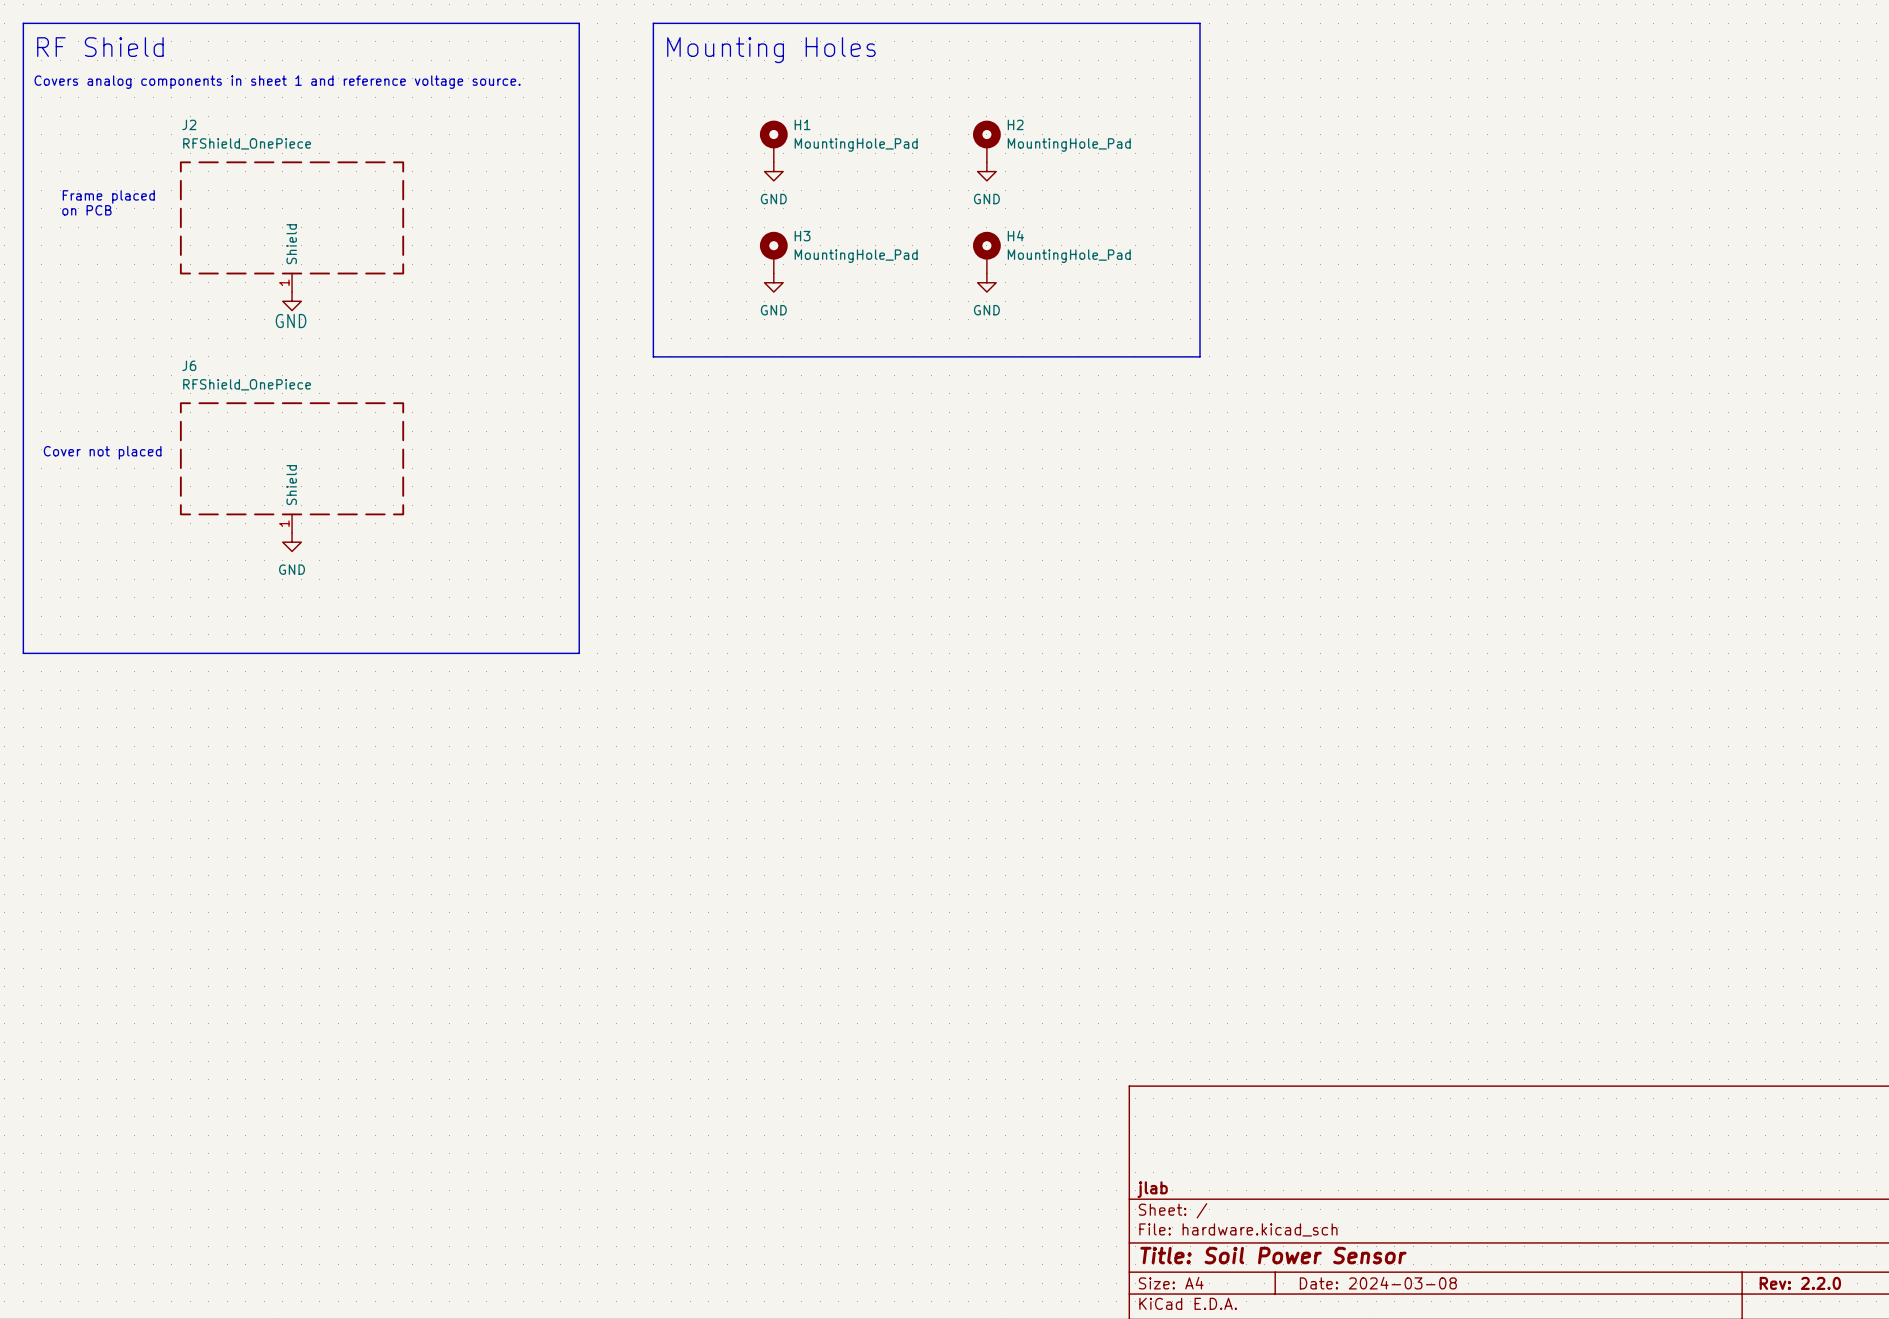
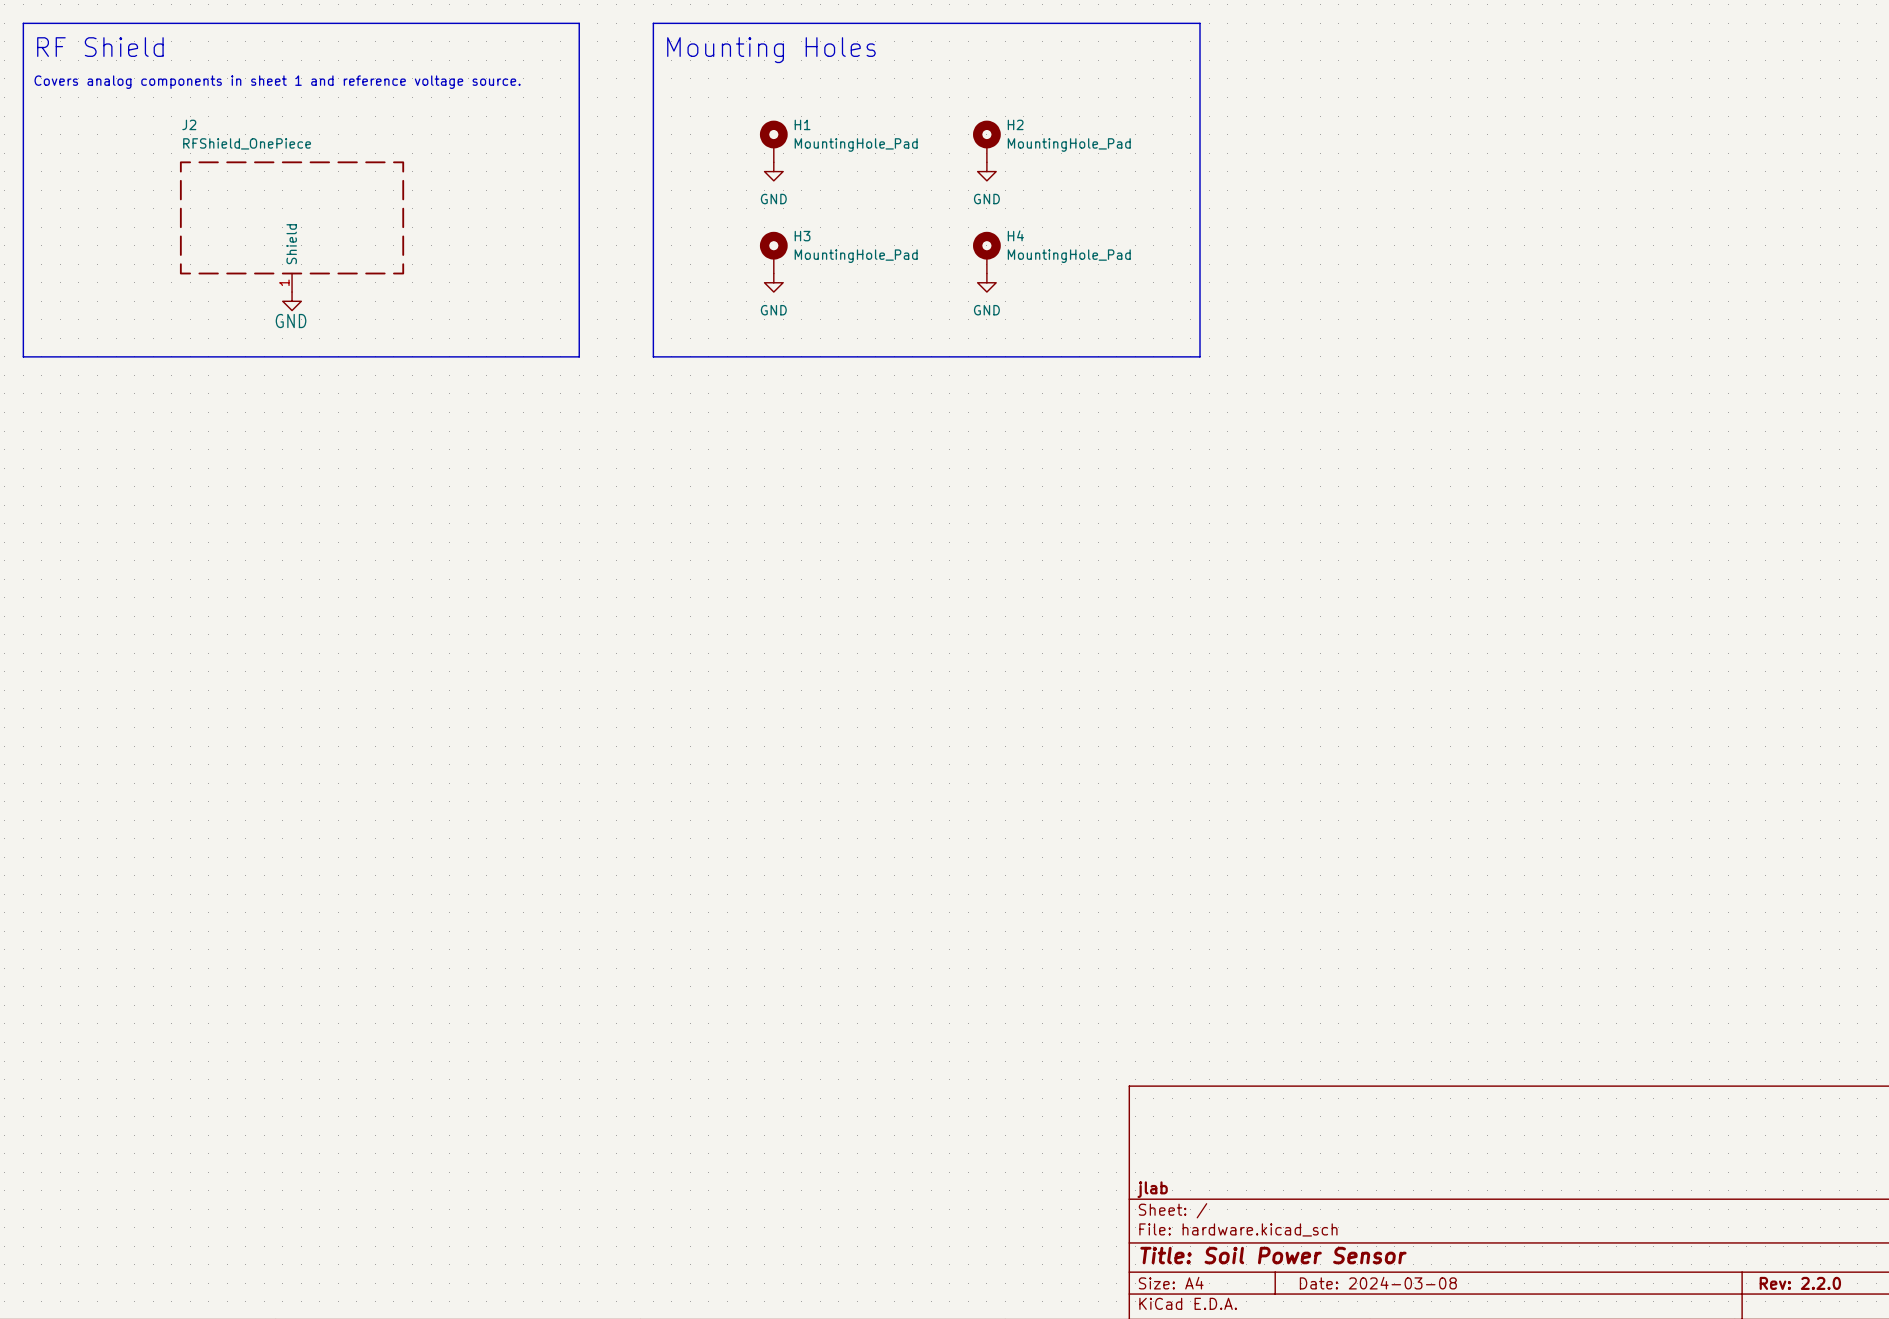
text: Frame placed (108, 196) -> none
text: on PCB (86, 210) -> none
line: (23, 356) (23, 653) (579, 653) (579, 356) -> (23, 356) (579, 356)
text: Cover not placed (102, 452) -> none
J6: RFShield_OnePiece (292, 467) -> none
power symbol: GND (292, 542) -> none

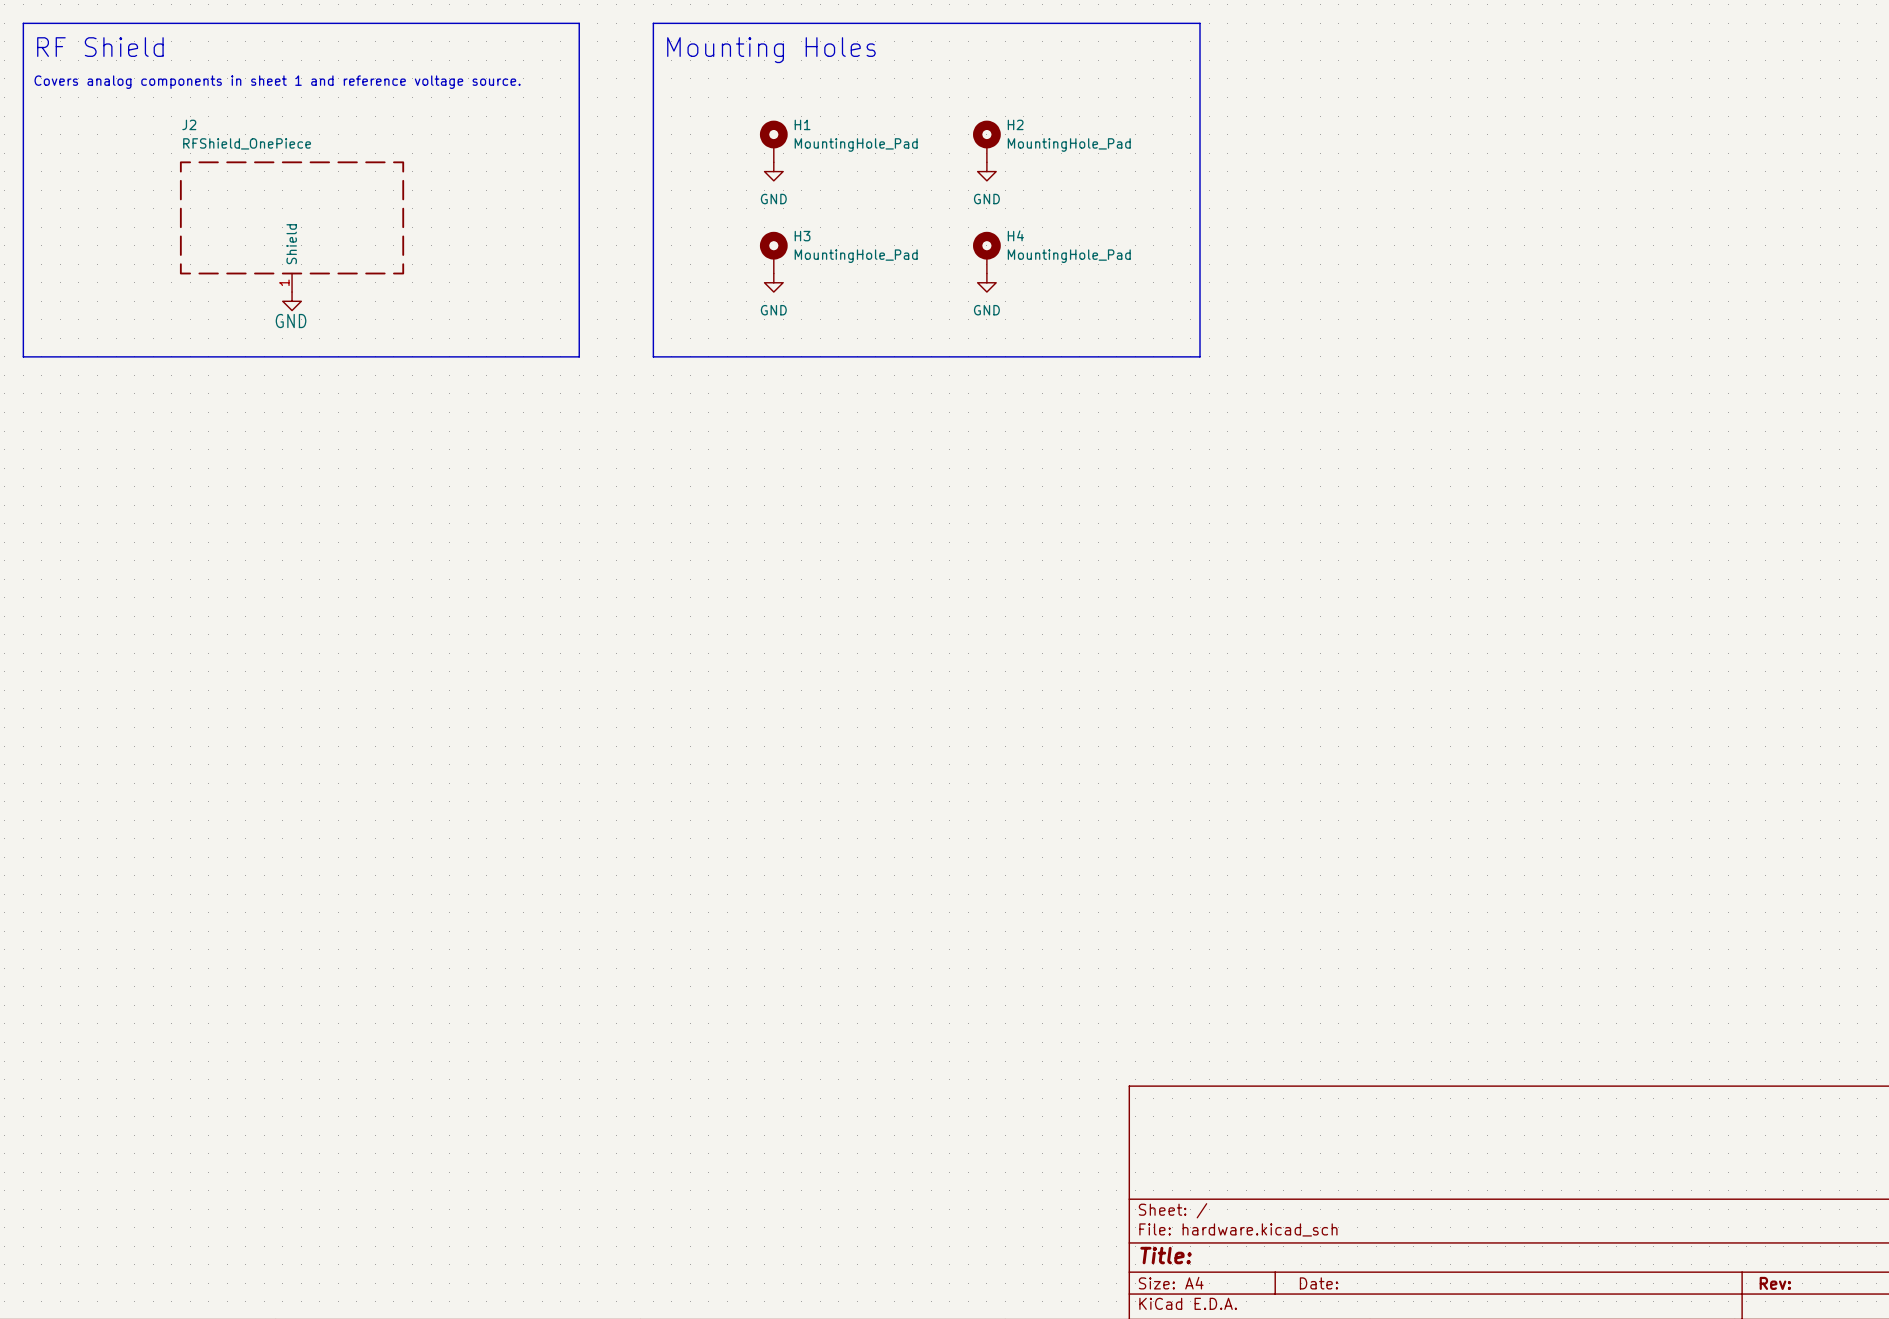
title block: jlab (1152, 1189) -> none
title block: Title: Soil Power Sensor (1273, 1255) -> Title: (1166, 1255)
title block: Date: 2024-03-08 (1378, 1283) -> Date: (1318, 1283)
title block: Rev: 2.2.0 (1800, 1283) -> Rev: (1775, 1283)

